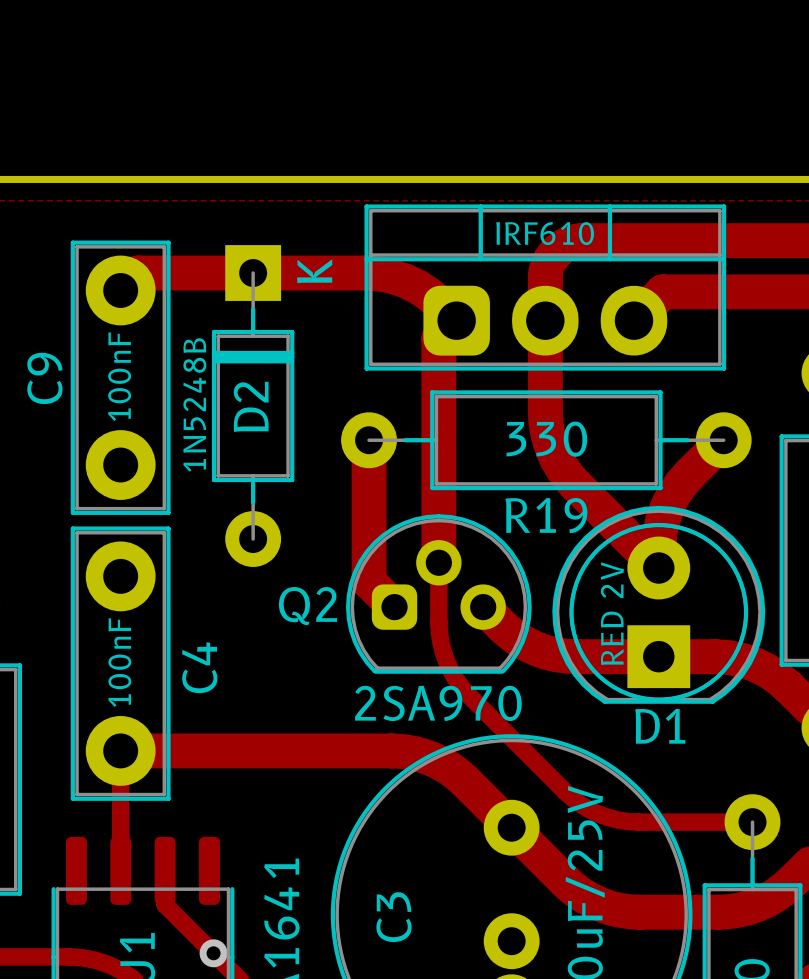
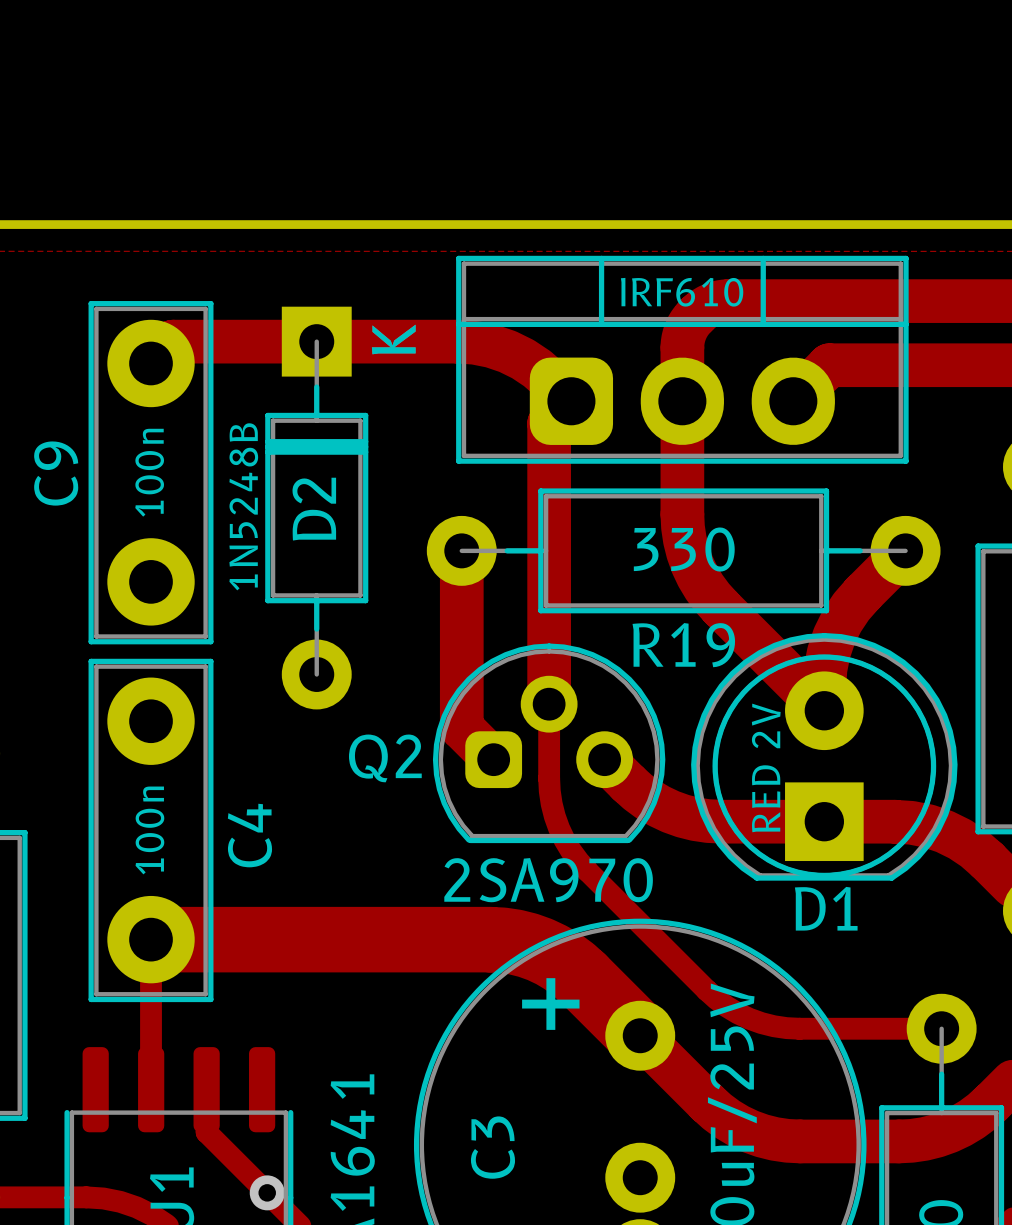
C9 value: 100nF (119, 376) -> 100n (149, 472)
C4 value: 100nF (119, 662) -> 100n (149, 830)
track width: thin (120, 750) (391, 750) (411, 752) (440, 763) (457, 774) (511, 827) -> thick (151, 939) (489, 939) (515, 942) (551, 955) (573, 969) (640, 1035)
C3 text: none -> + (550, 1004)

